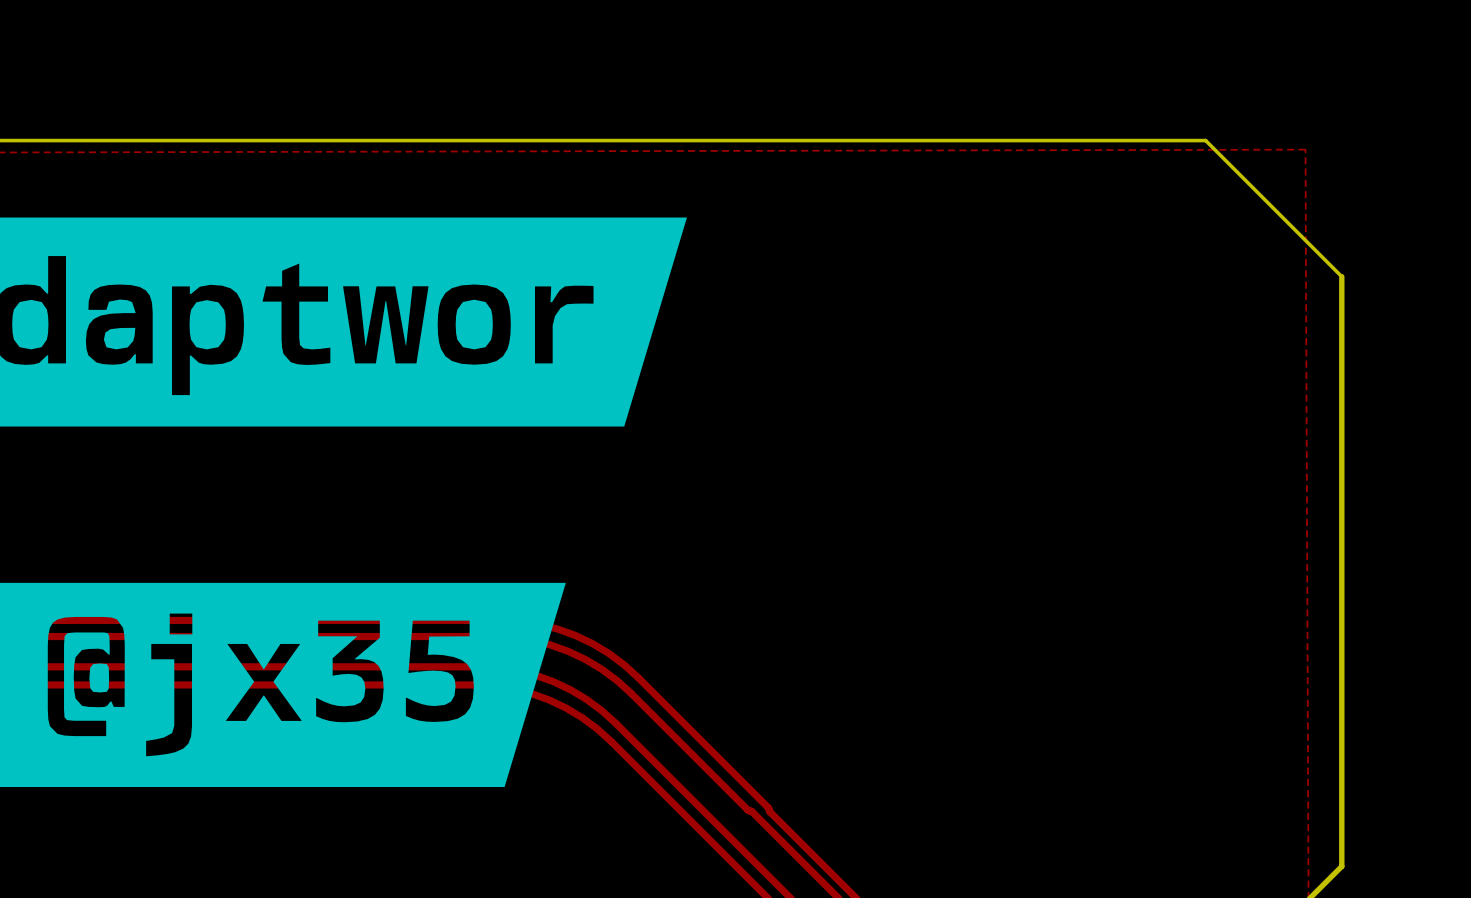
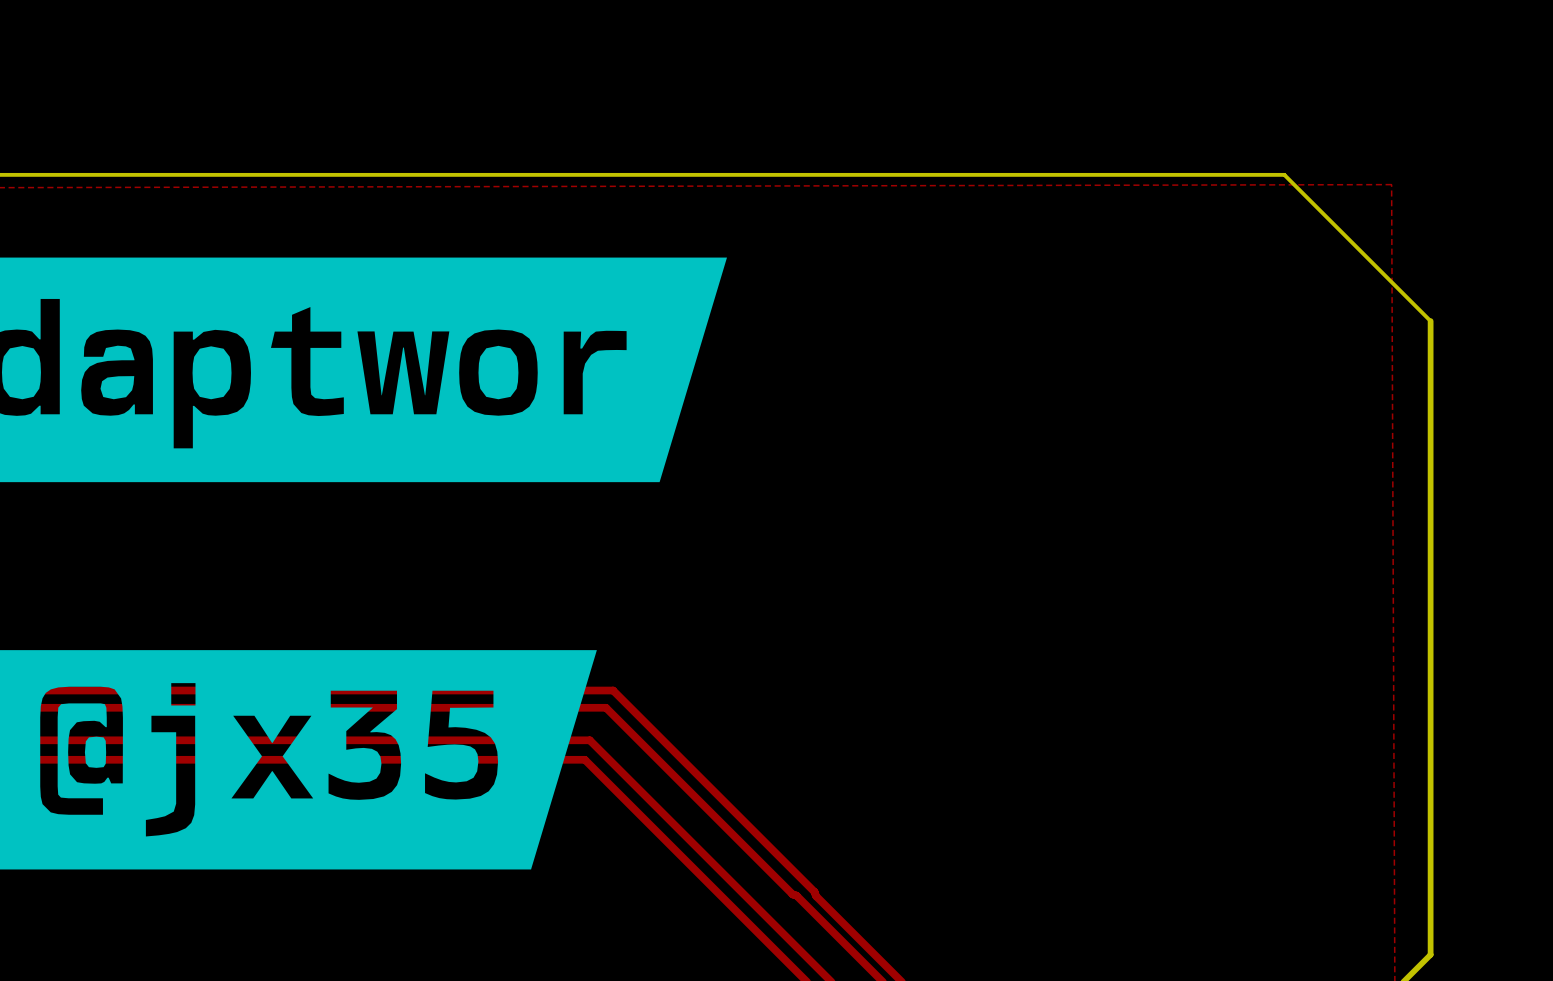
top track: (500, 620) (538, 624) (574, 635) (608, 653) (637, 677) -> (526, 690) (613, 690) (674, 751)
top track: (493, 636) (531, 640) (568, 651) (601, 669) (631, 693) -> (519, 707) (606, 707) (667, 768)
top track: (478, 666) (516, 670) (553, 681) (586, 699) (616, 723) -> (503, 740) (589, 740) (651, 801)
top track: (474, 684) (512, 688) (548, 699) (582, 717) (611, 741) -> (498, 759) (584, 759) (646, 820)

